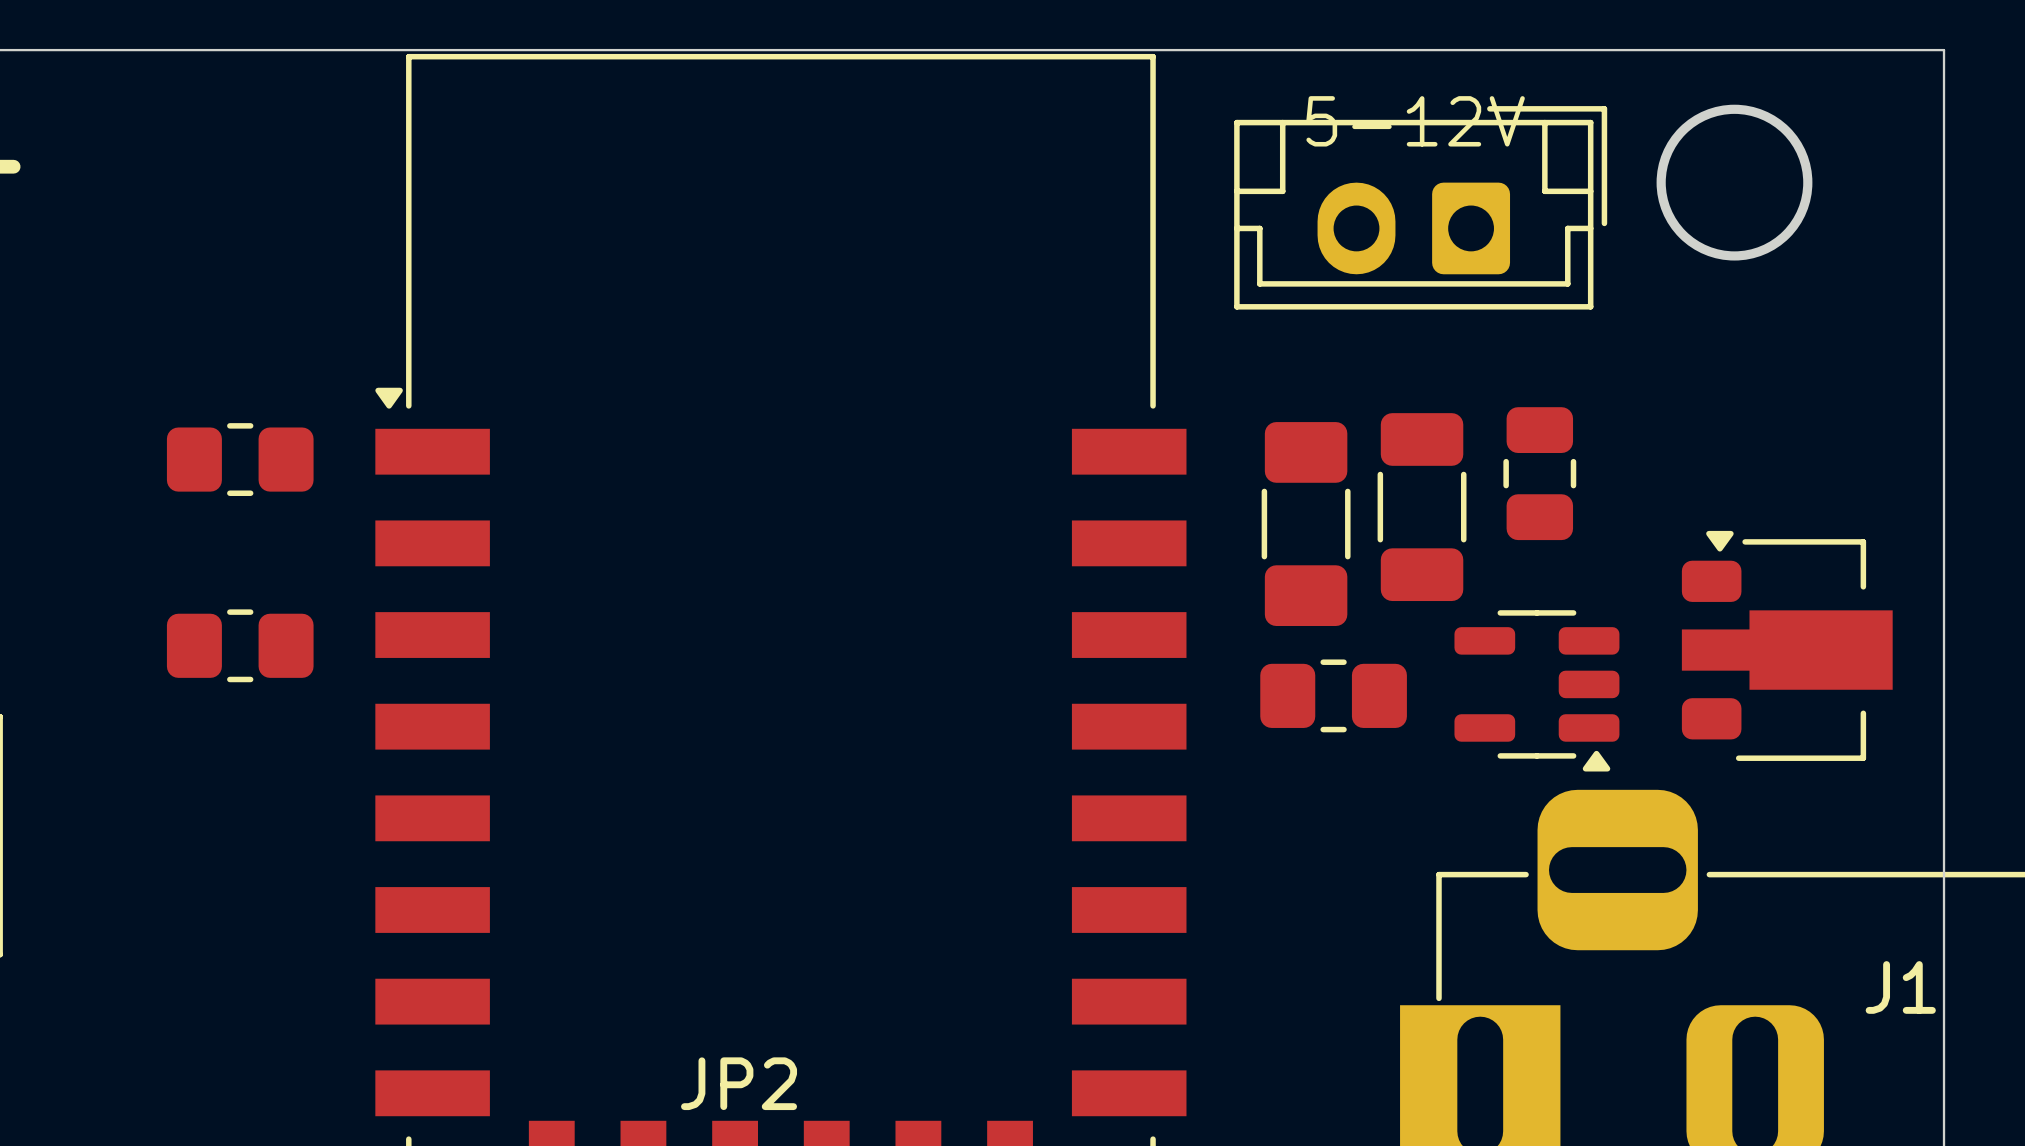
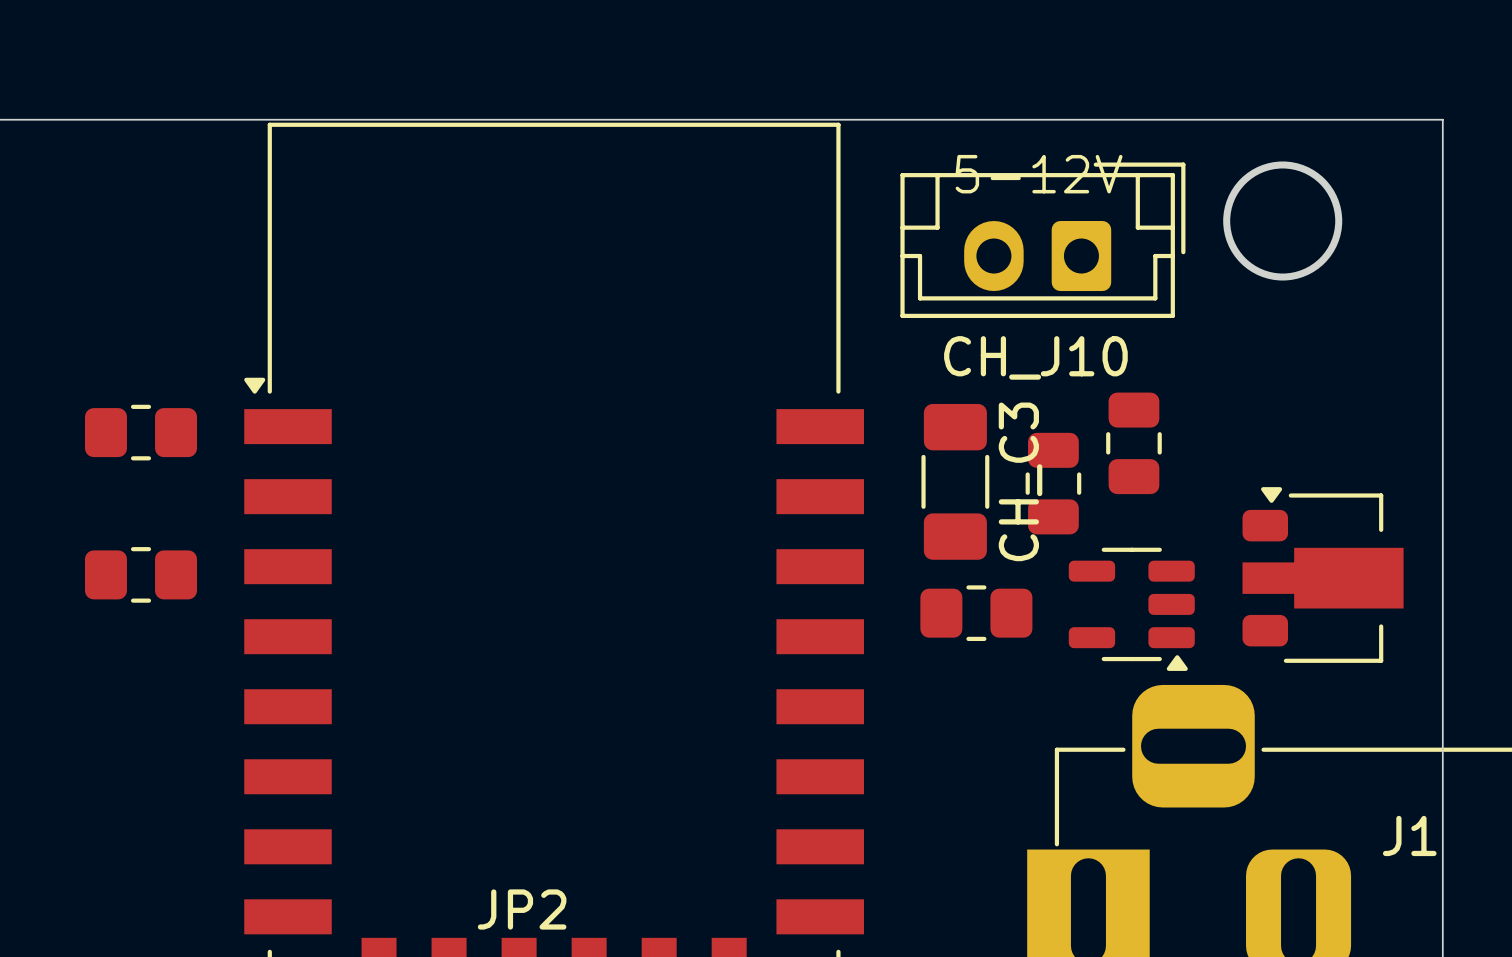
CH_J10 name: none -> CH_J10 (1035, 357)
part footprint: [1377, 413, 1467, 602] -> [1025, 432, 1082, 535]
CH_C3 name: none -> CH_C3 (1020, 481)

